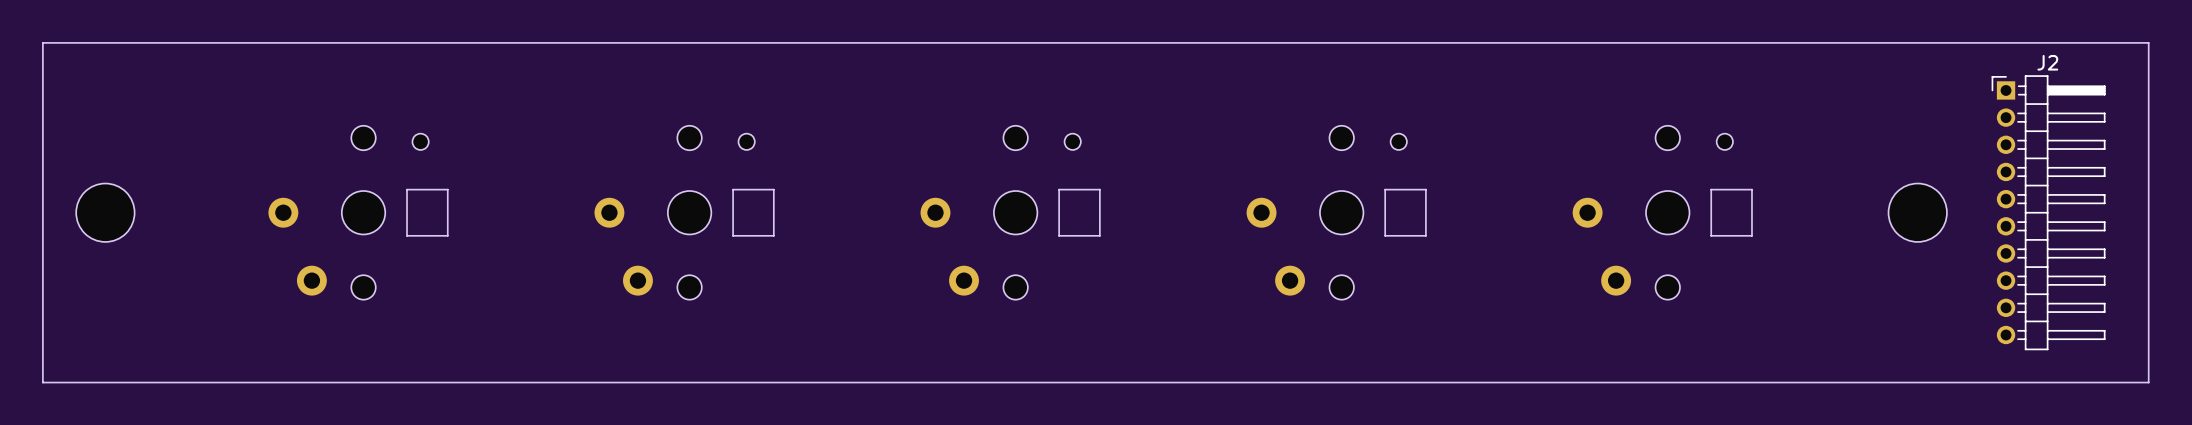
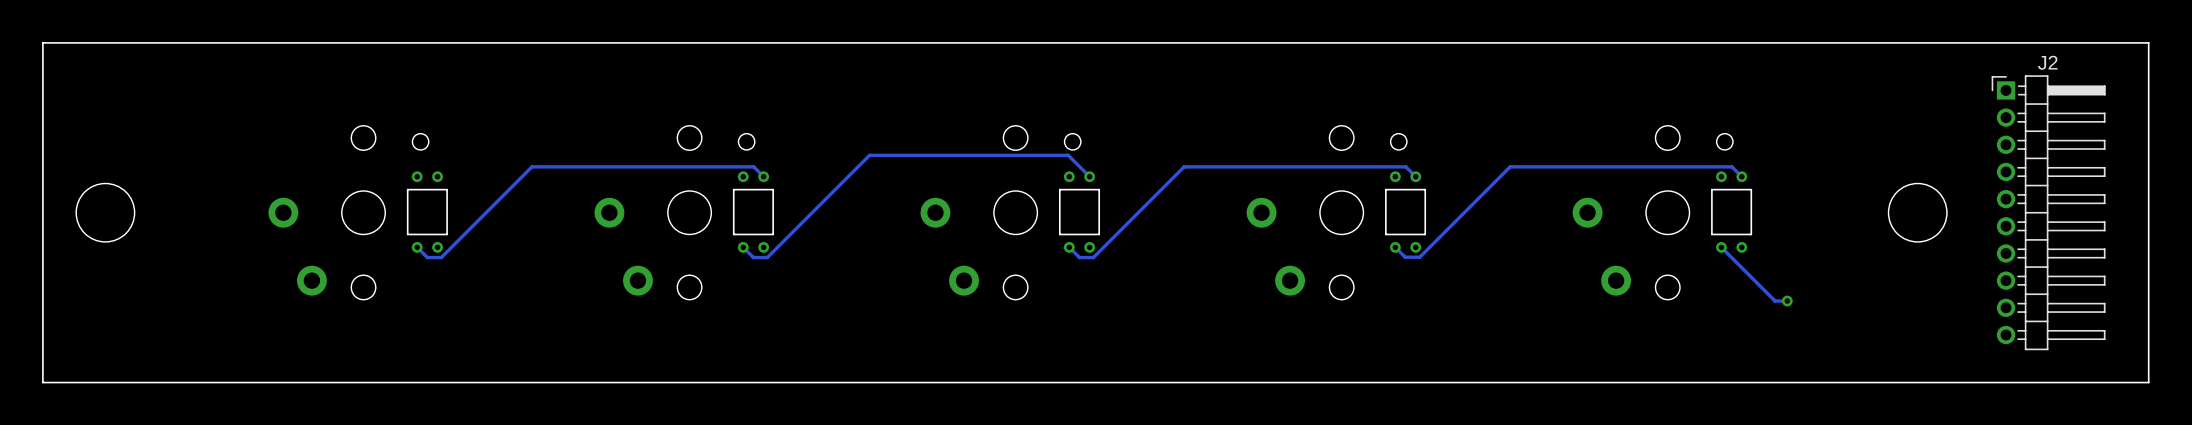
track: none -> (763, 176) (753, 166) (531, 166) (441, 257) (427, 257) (417, 247)
track: none -> (1089, 176) (1068, 155) (869, 155) (767, 257) (753, 257) (743, 247)
track: none -> (1415, 176) (1405, 166) (1184, 166) (1093, 257) (1079, 257) (1069, 247)
track: none -> (1741, 176) (1731, 166) (1510, 166) (1419, 257) (1405, 257) (1395, 247)
part footprint: [406, 188, 449, 237] -> [406, 171, 448, 253]
part footprint: [732, 188, 775, 237] -> [732, 171, 774, 253]
part footprint: [1058, 188, 1101, 237] -> [1058, 171, 1101, 253]
part footprint: [1384, 188, 1427, 237] -> [1385, 171, 1427, 253]
part footprint: [1710, 188, 1753, 237] -> [1711, 171, 1753, 253]
track: none -> (1721, 247) (1775, 301) (1787, 301)
via: none -> (1787, 301)

